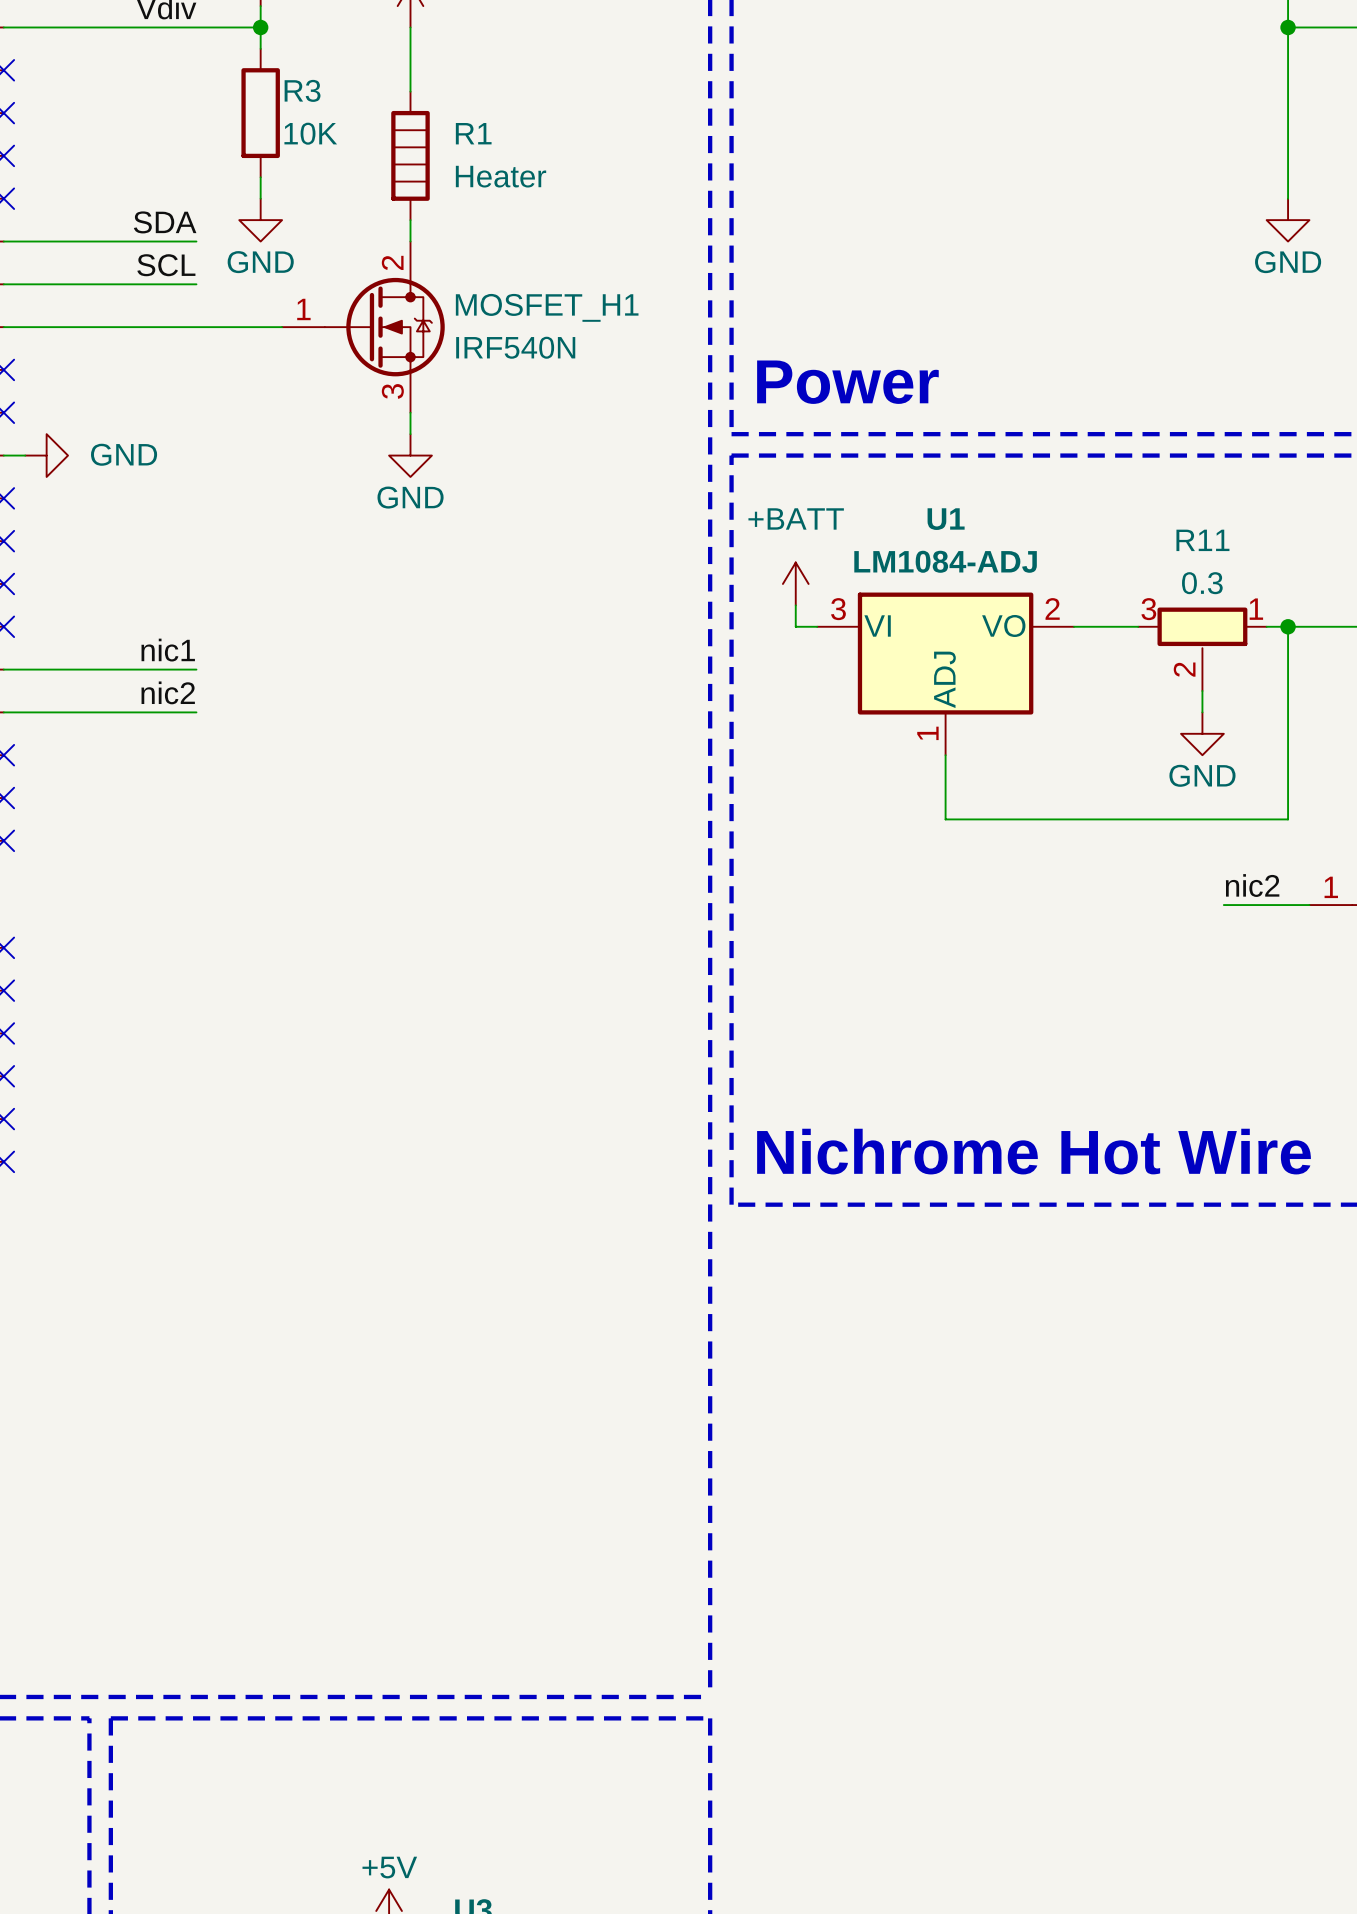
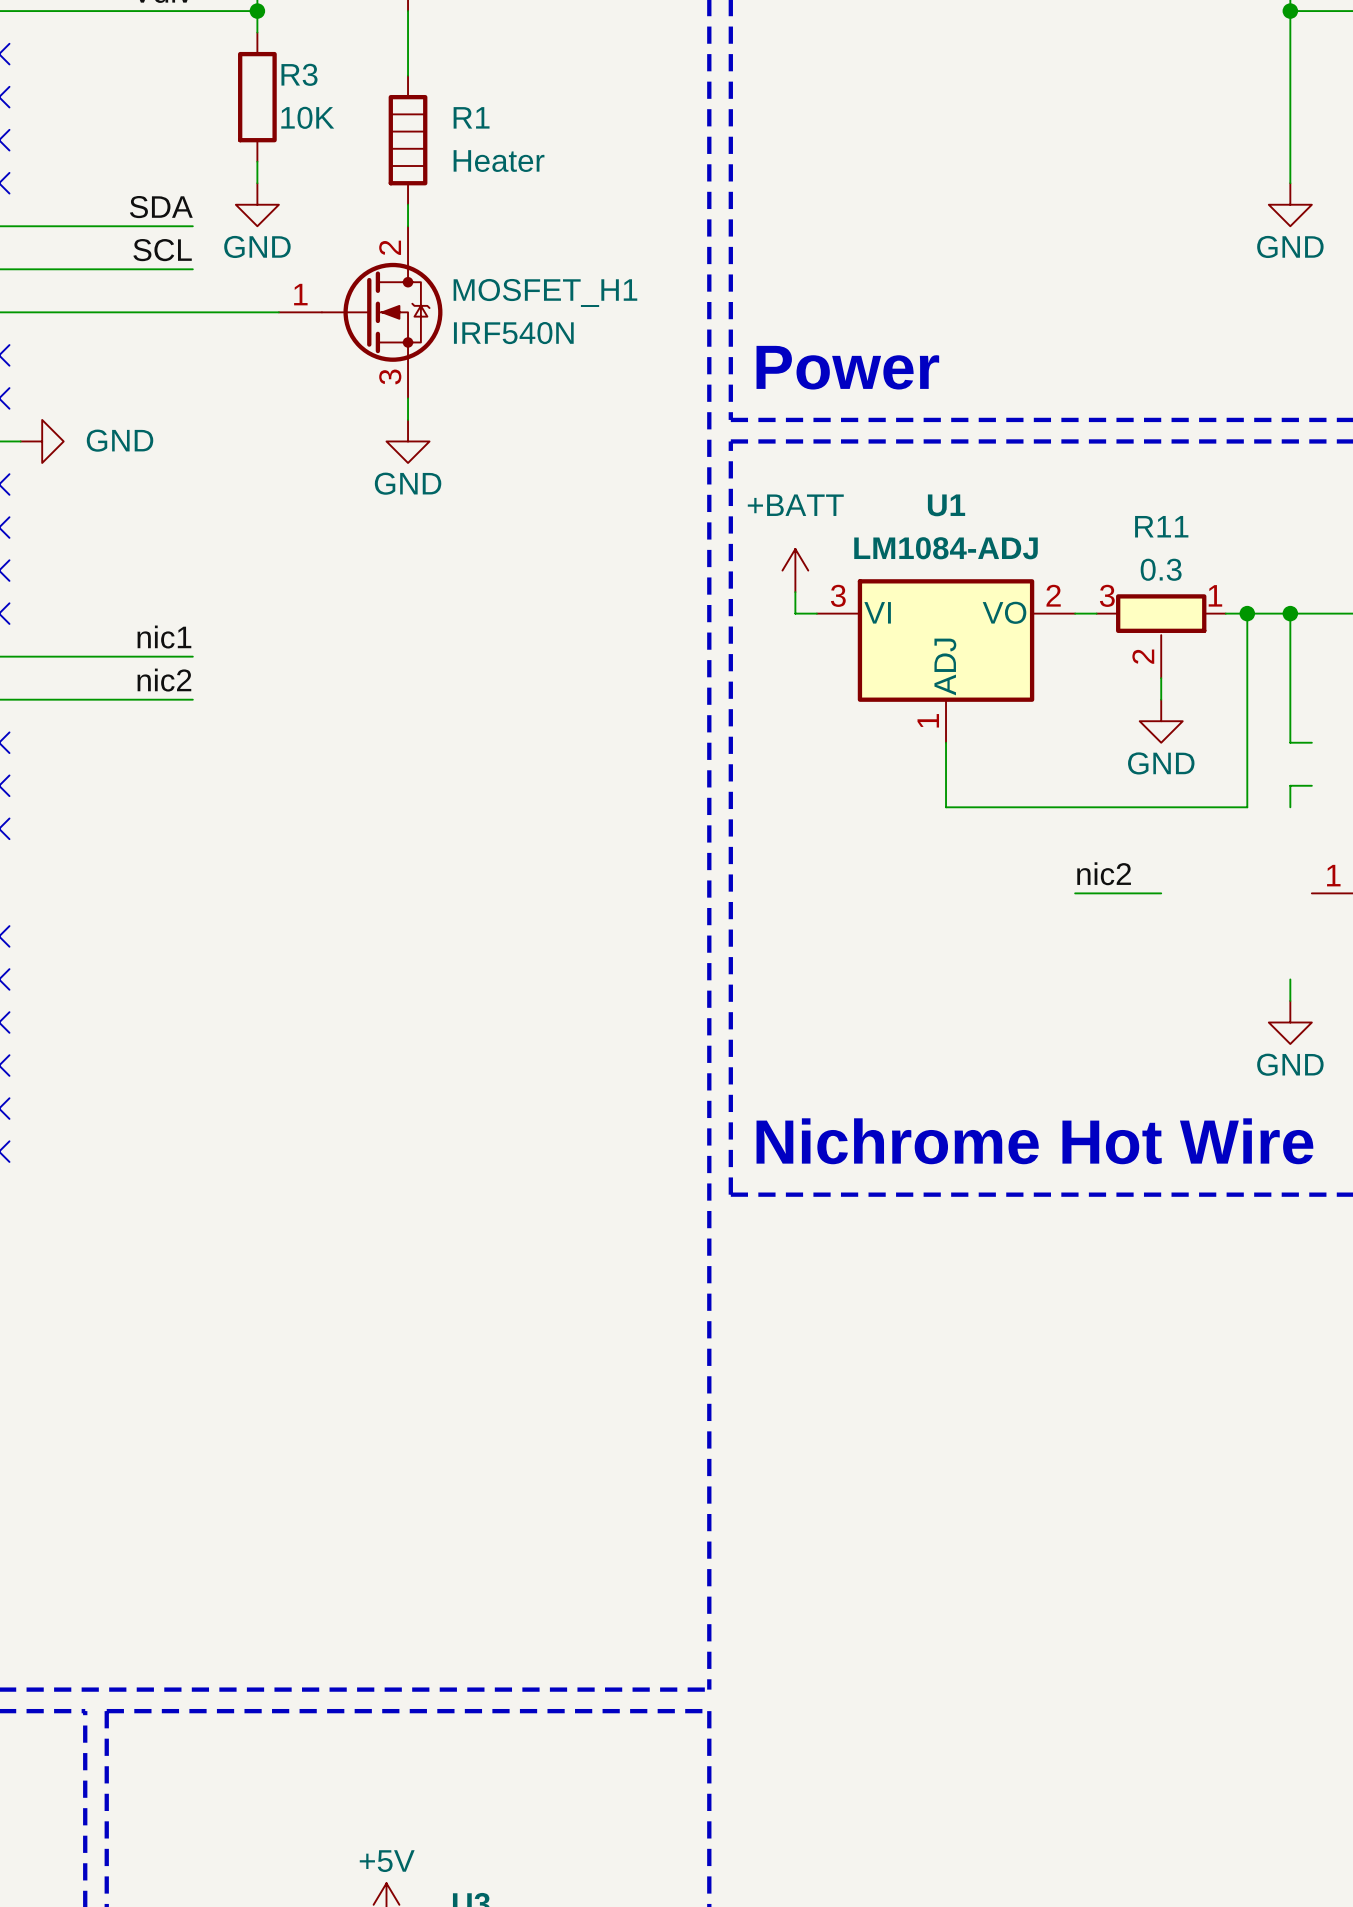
junction: none -> (1247, 613)
R11 position: (1202, 649) -> (1161, 636)
wire: (1202, 691) (1202, 712) -> (1161, 678) (1161, 699)
power symbol position: GND (1202, 733) -> GND (1161, 721)
wire: (1288, 755) (1288, 798) -> (1290, 742) (1311, 742)
wire: none -> (1290, 785) (1311, 785)
wire: (1245, 819) (1288, 819) -> (1247, 807) (1247, 613)
label position: nic2 (1252, 885) -> nic2 (1104, 873)
wire: (1223, 905) (1309, 905) -> (1075, 893) (1161, 893)
wire: none -> (1290, 979) (1290, 1000)
power symbol: none -> GND (1290, 1022)

